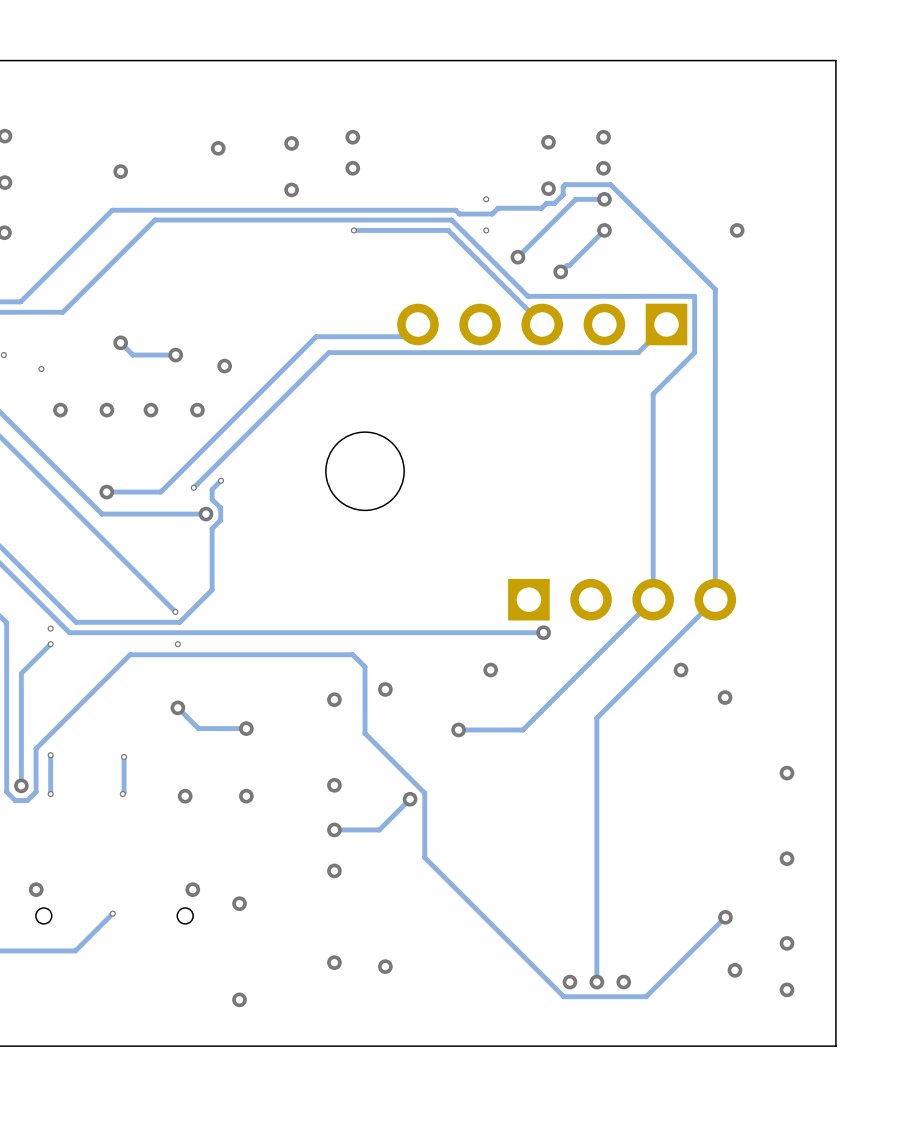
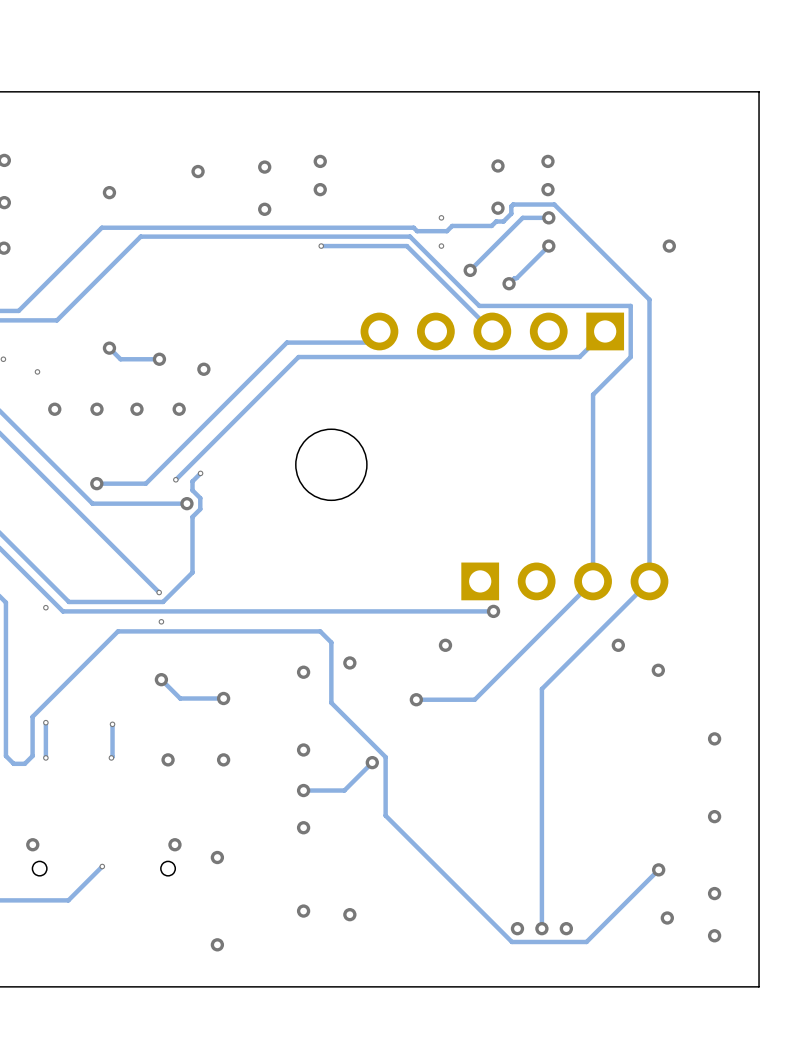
track: (50, 644) (21, 673) (21, 785) -> none
via: (50, 644) -> none
via: (21, 785) -> none

